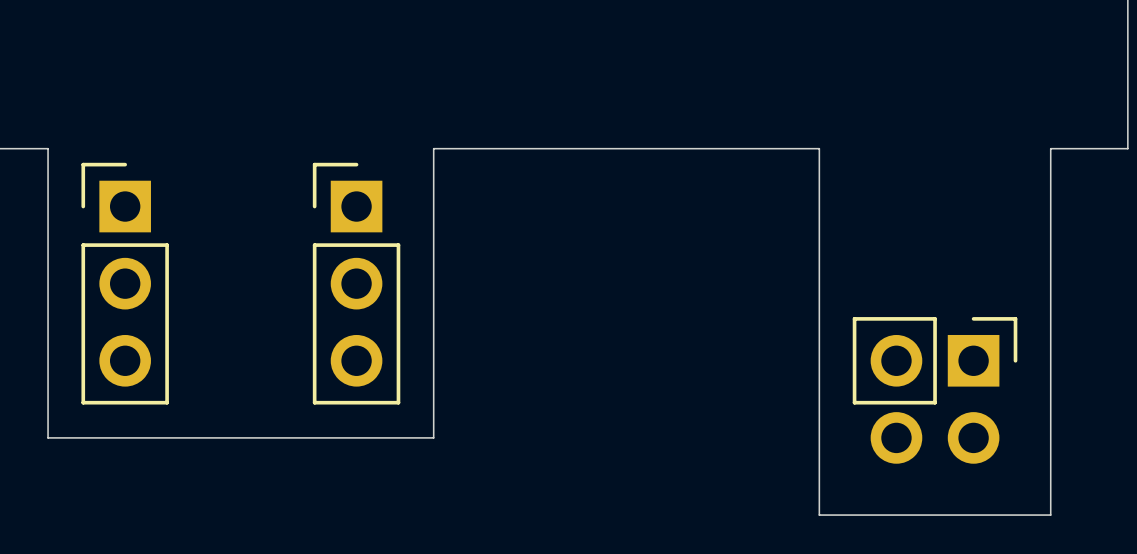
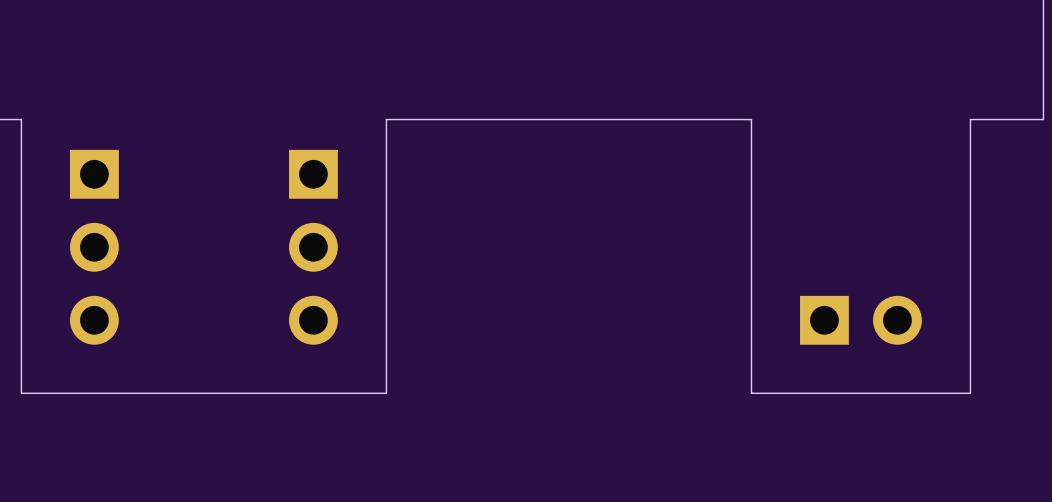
part footprint: [81, 162, 169, 405] -> [70, 149, 119, 345]
part footprint: [312, 162, 401, 405] -> [289, 149, 338, 345]
part footprint: [852, 317, 1018, 405] -> [800, 295, 922, 345]
part: (896, 437) -> none
part: (973, 437) -> none
board edge: (1050, 437) (1050, 515) (819, 515) (819, 437) -> (970, 393) (751, 393)

